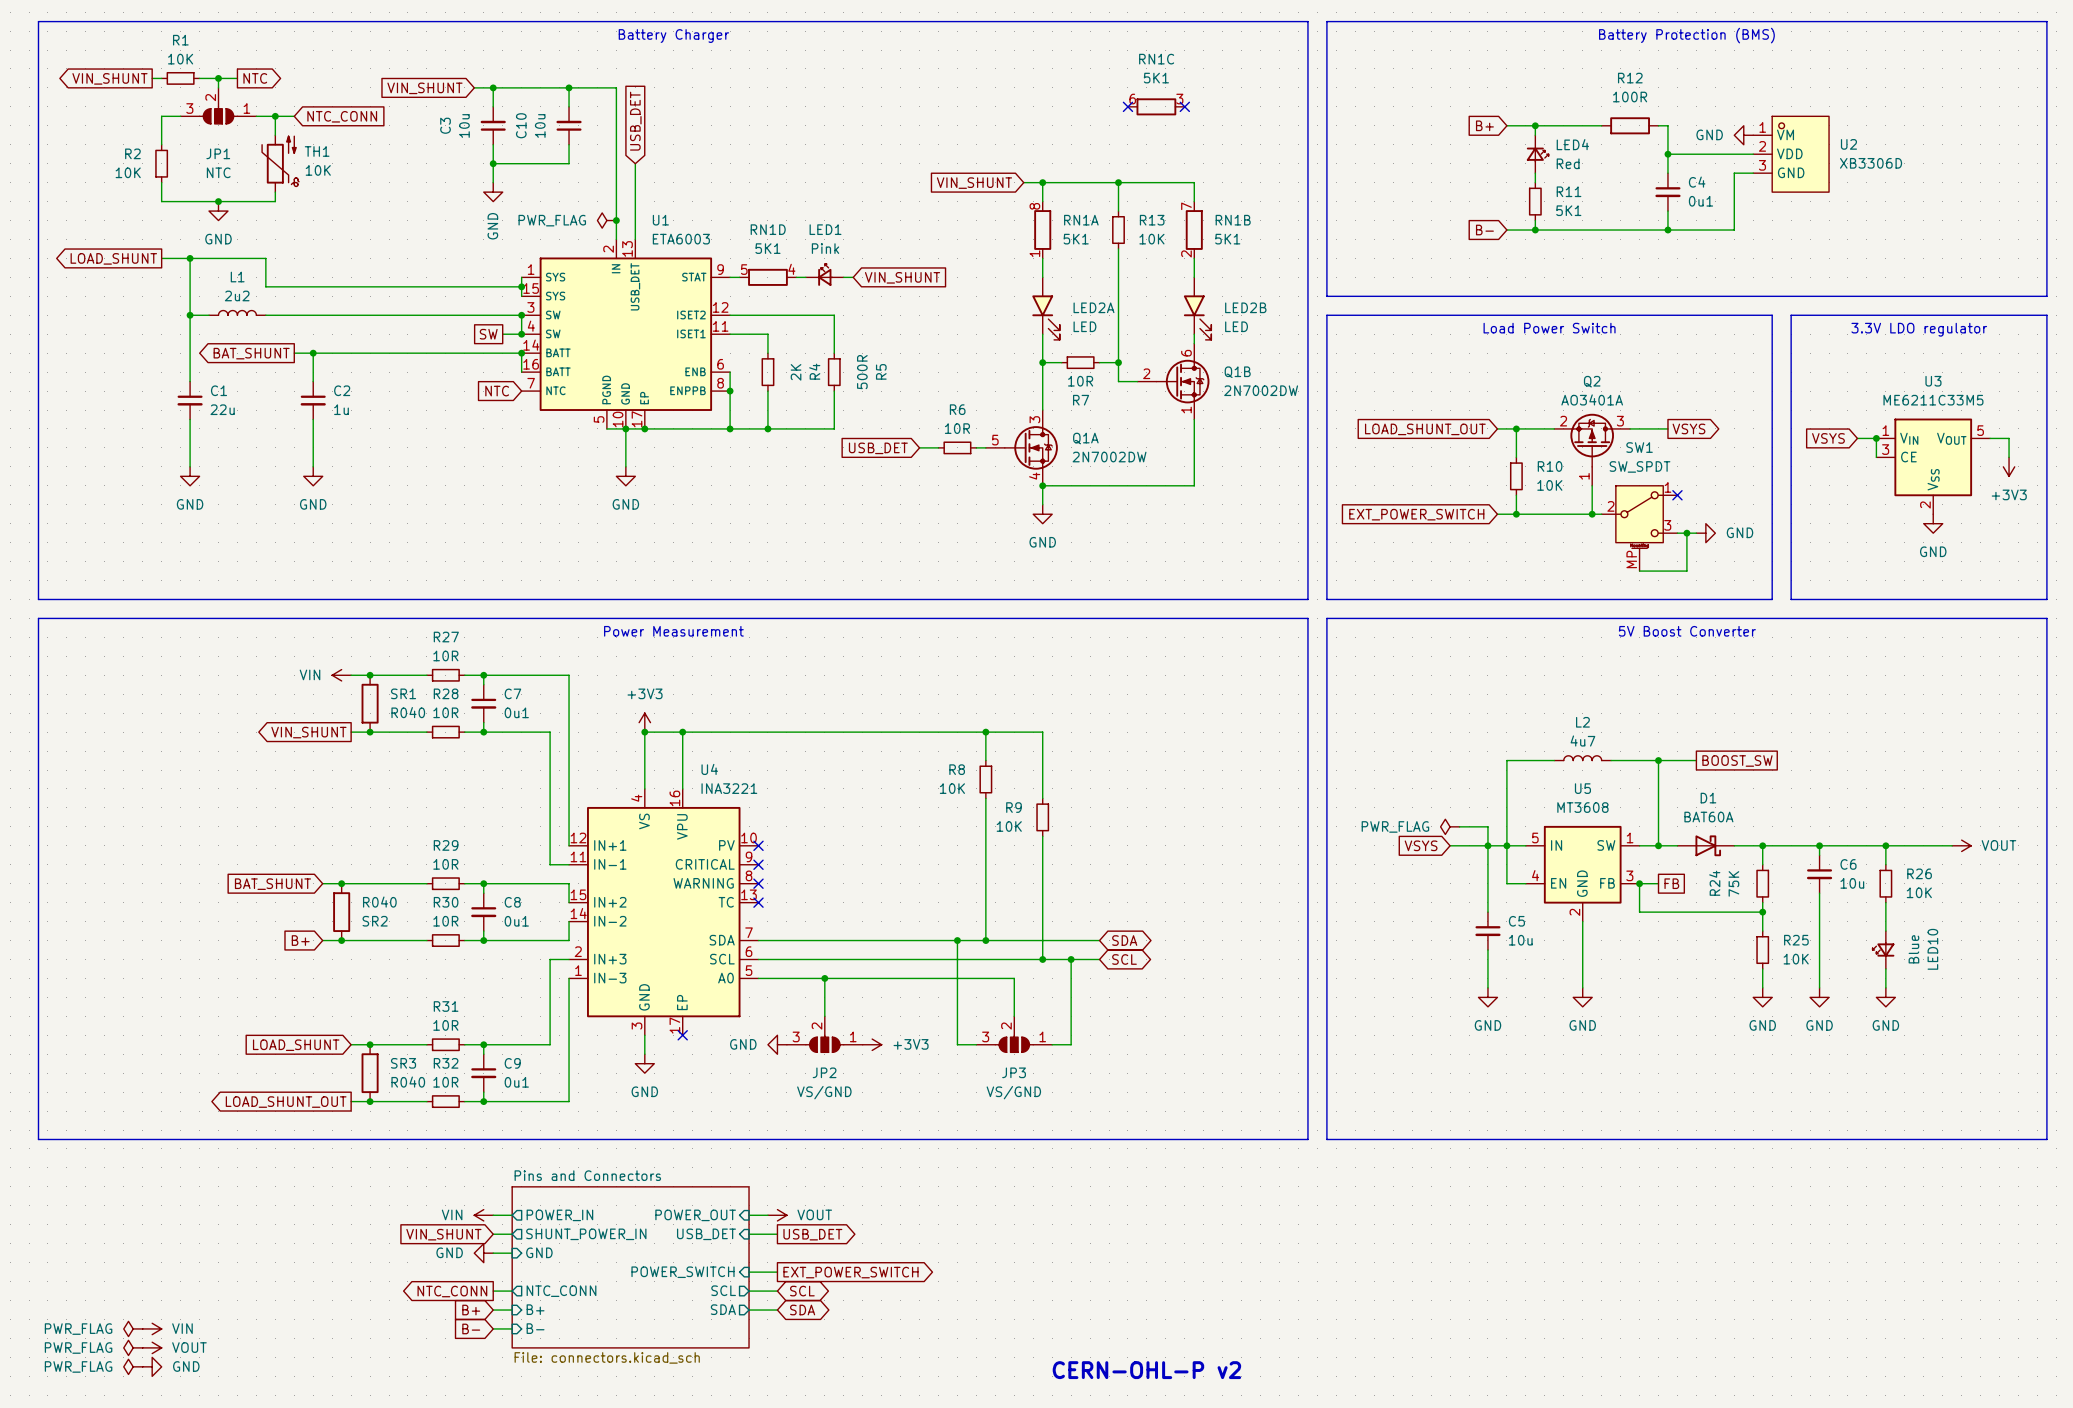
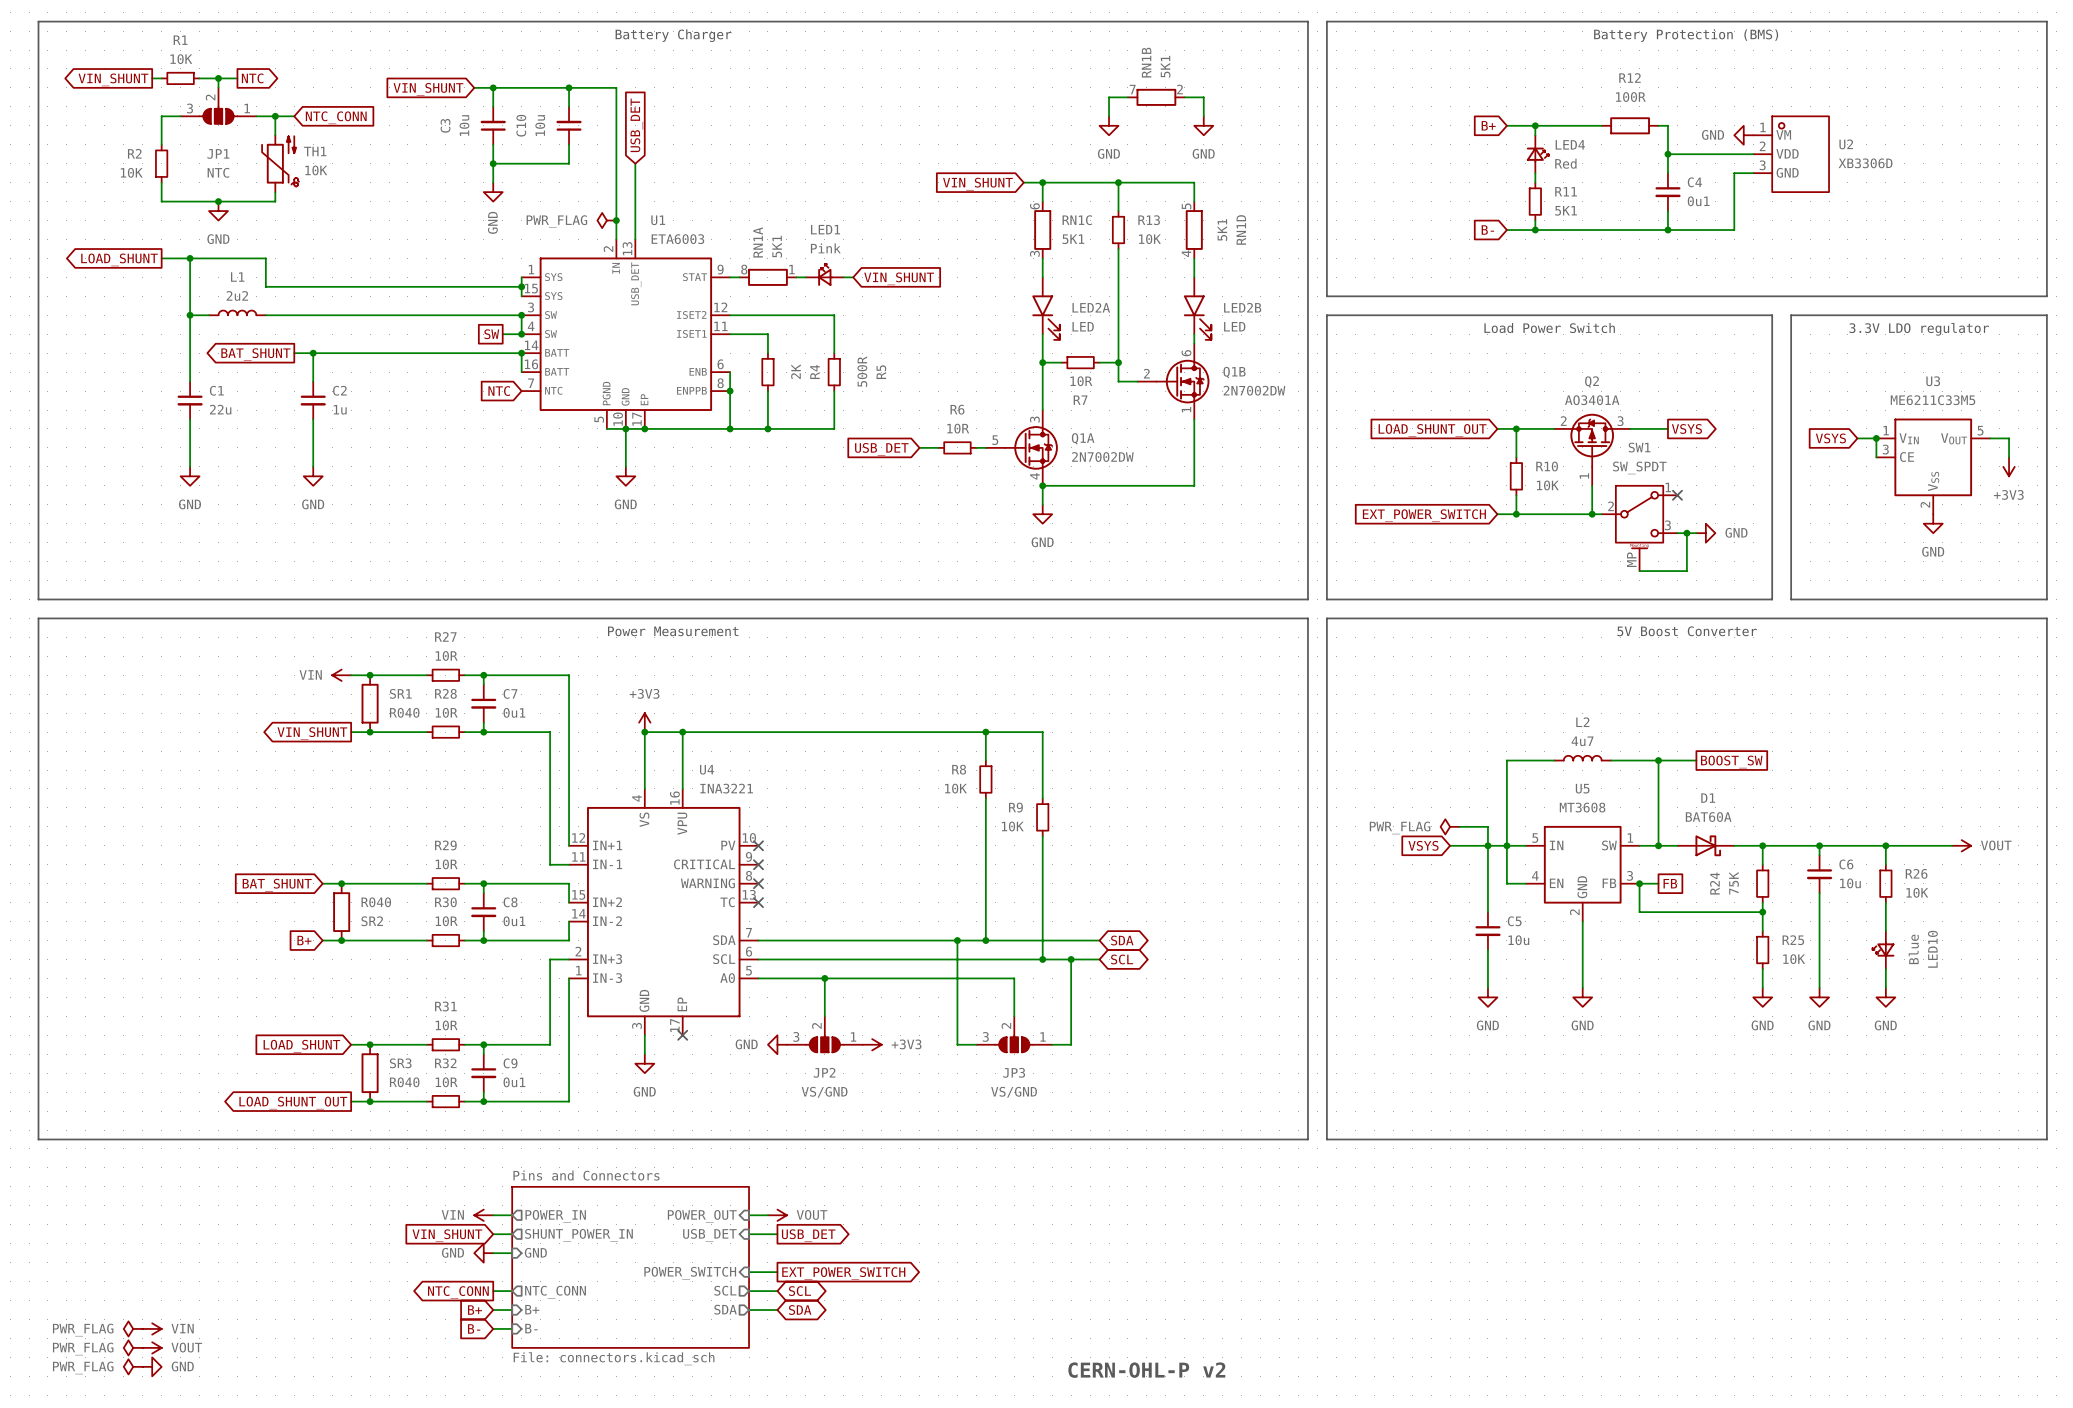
wire: none -> (1127, 97) (1109, 97) (1109, 116)
wire: none -> (1184, 97) (1203, 97) (1203, 116)
no-connect mark: (1127, 106) -> none
RN1C rotation: 0° (1156, 106) -> 90° clockwise (1042, 230)
RN1C position: (1156, 106) -> (1042, 230)
no-connect mark: (1184, 106) -> none
power symbol: none -> GND (1109, 125)
power symbol: none -> GND (1203, 125)
RN1A rotation: 0° (1042, 230) -> 90° counterclockwise (767, 277)
RN1A position: (1042, 230) -> (767, 277)
RN1B rotation: 0° (1194, 230) -> 90° counterclockwise (1156, 97)
RN1B position: (1194, 230) -> (1156, 97)
RN1D rotation: 0° (767, 277) -> 90° clockwise (1194, 230)
RN1D position: (767, 277) -> (1194, 230)

